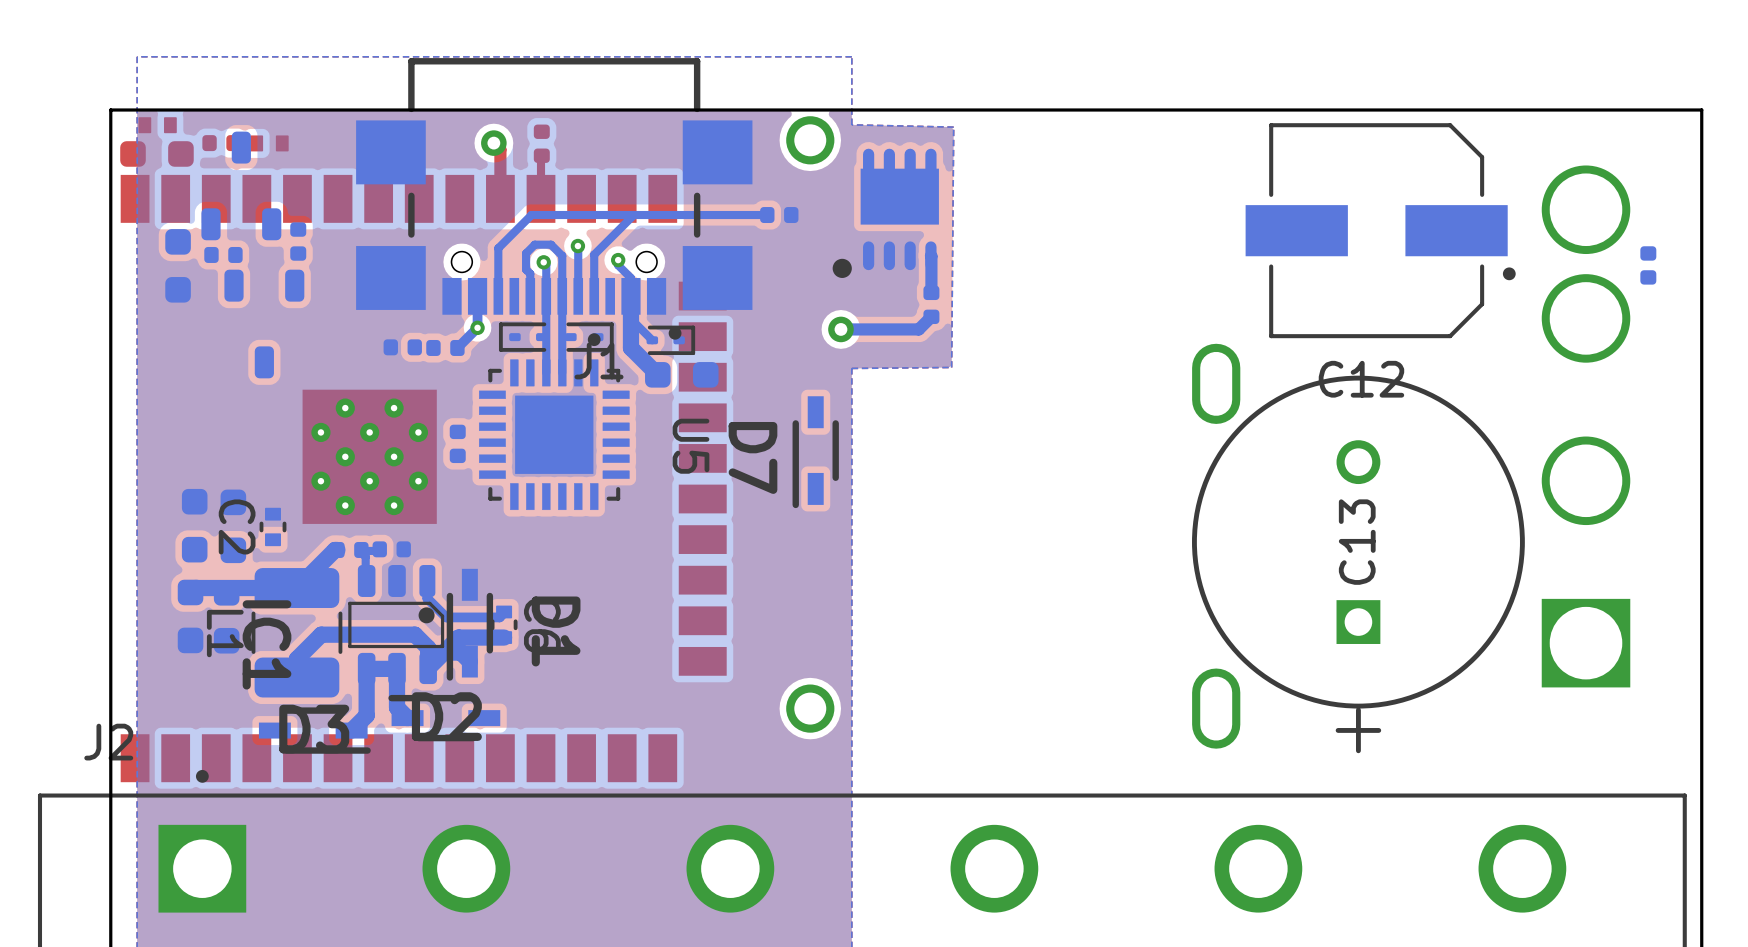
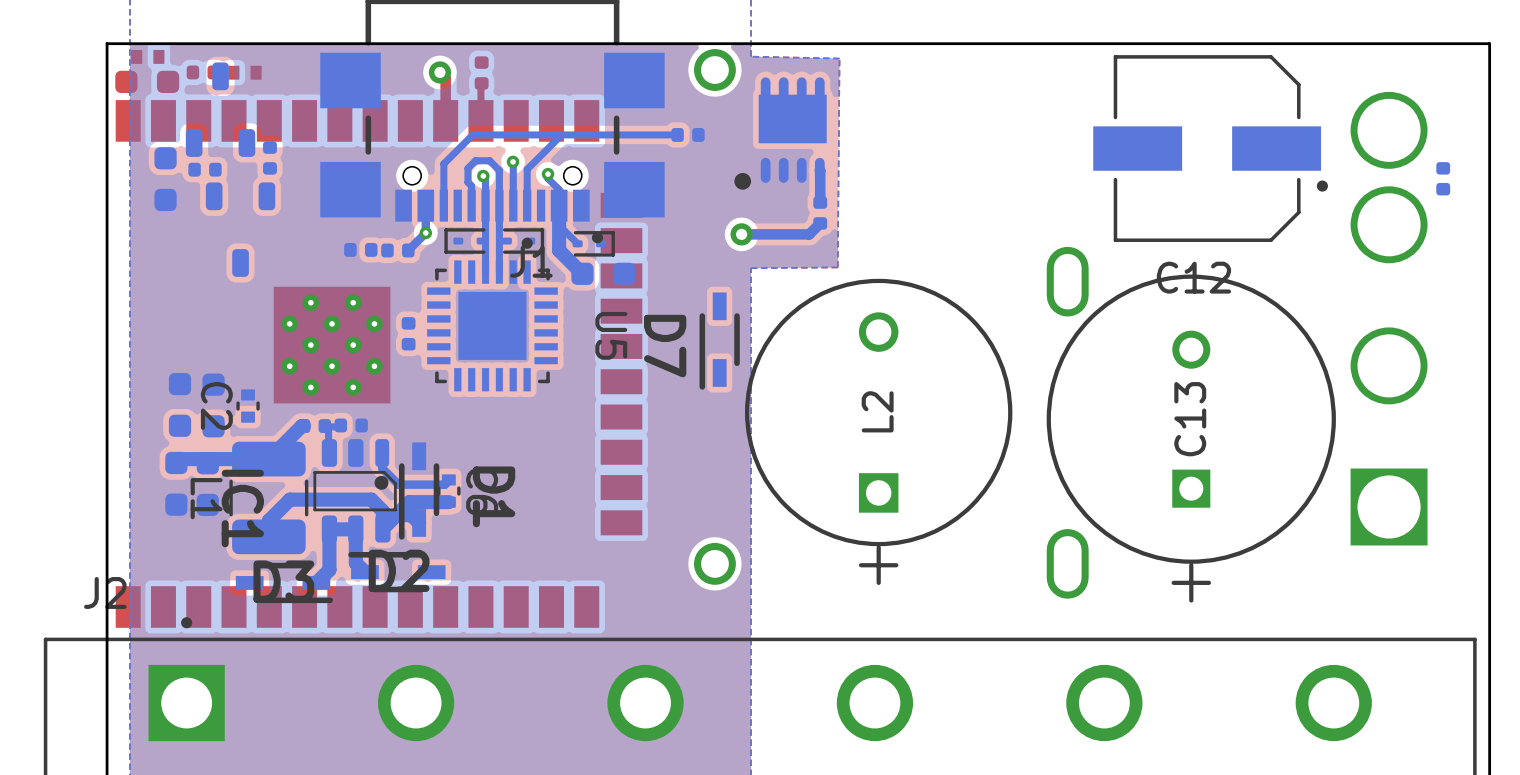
L2: none -> (878, 431)

